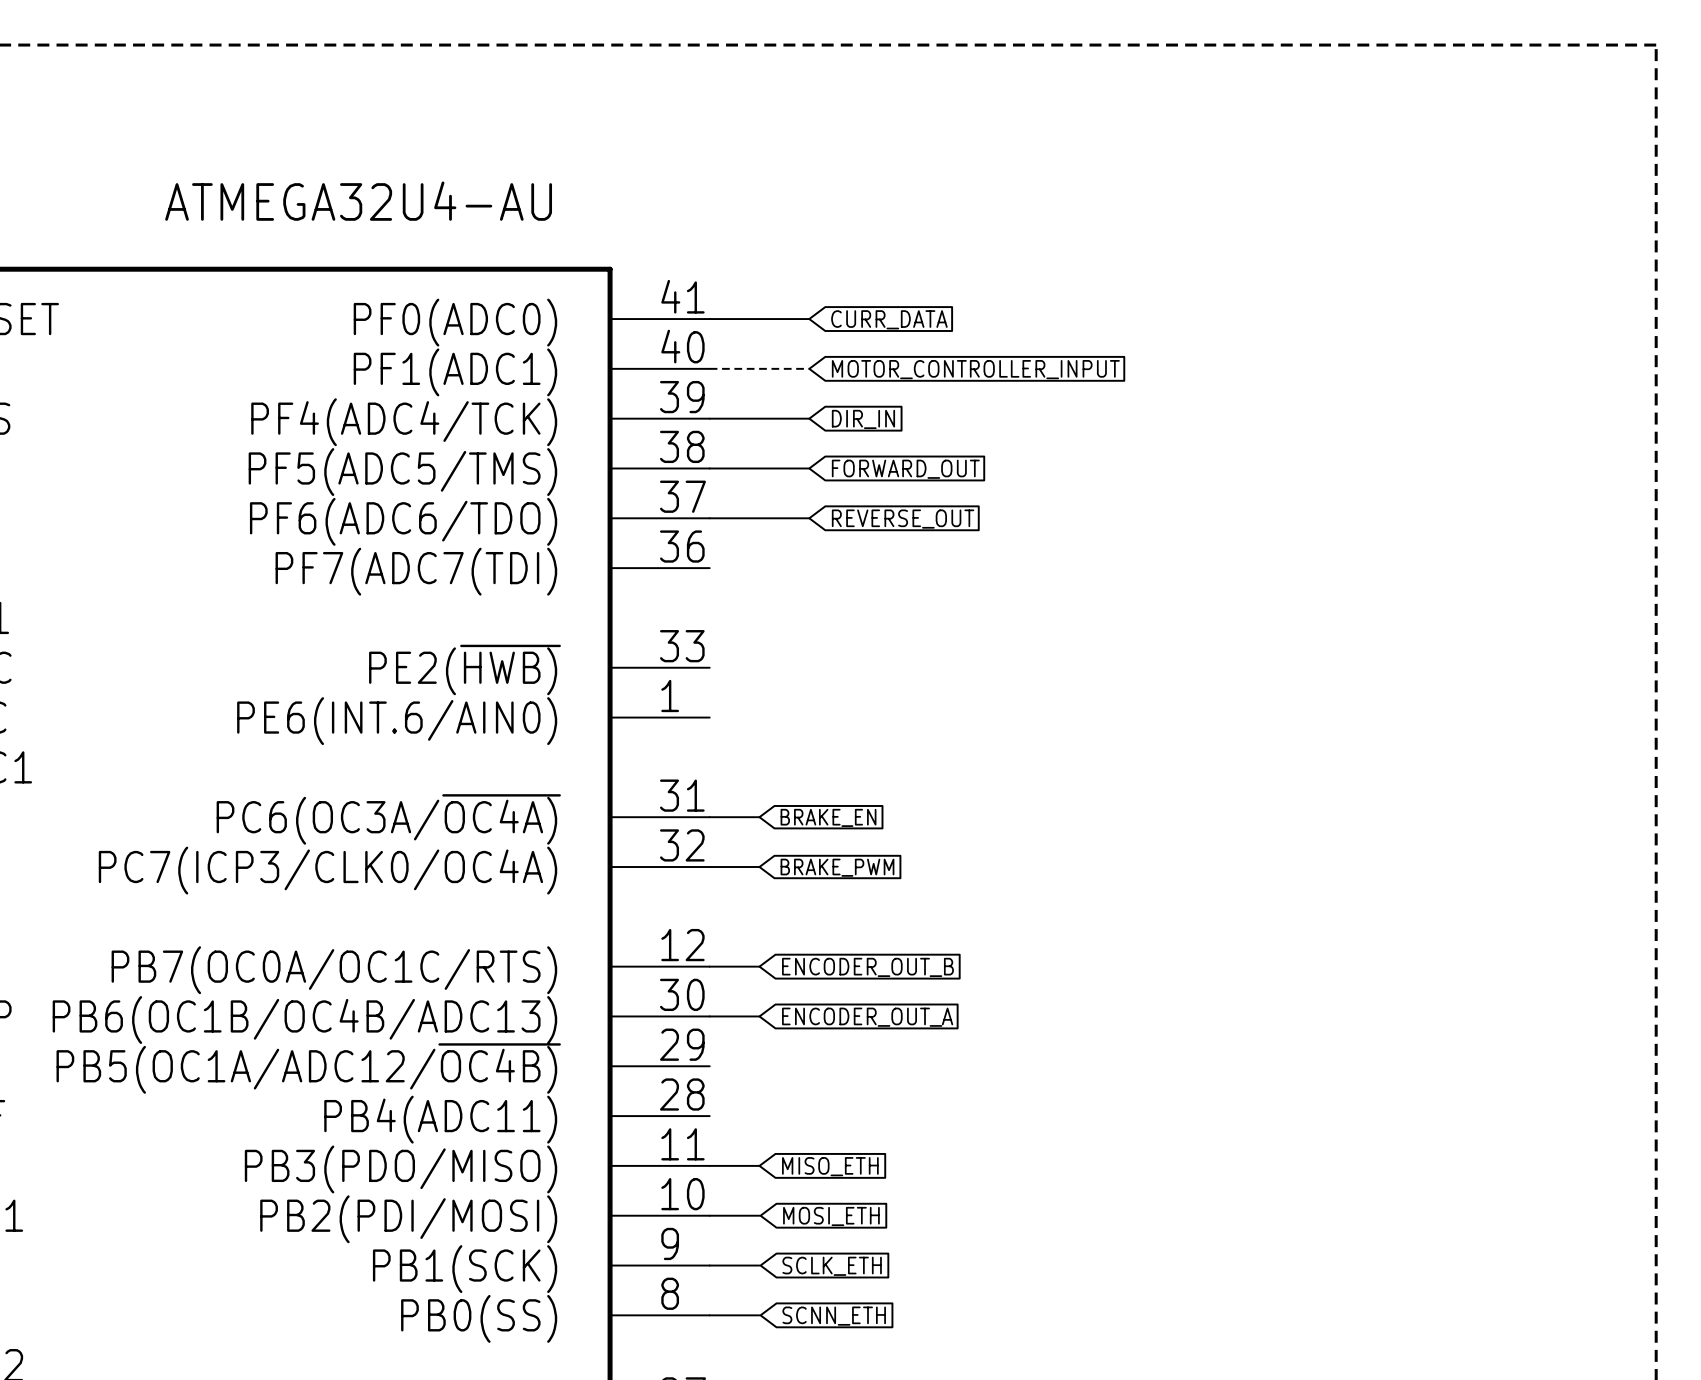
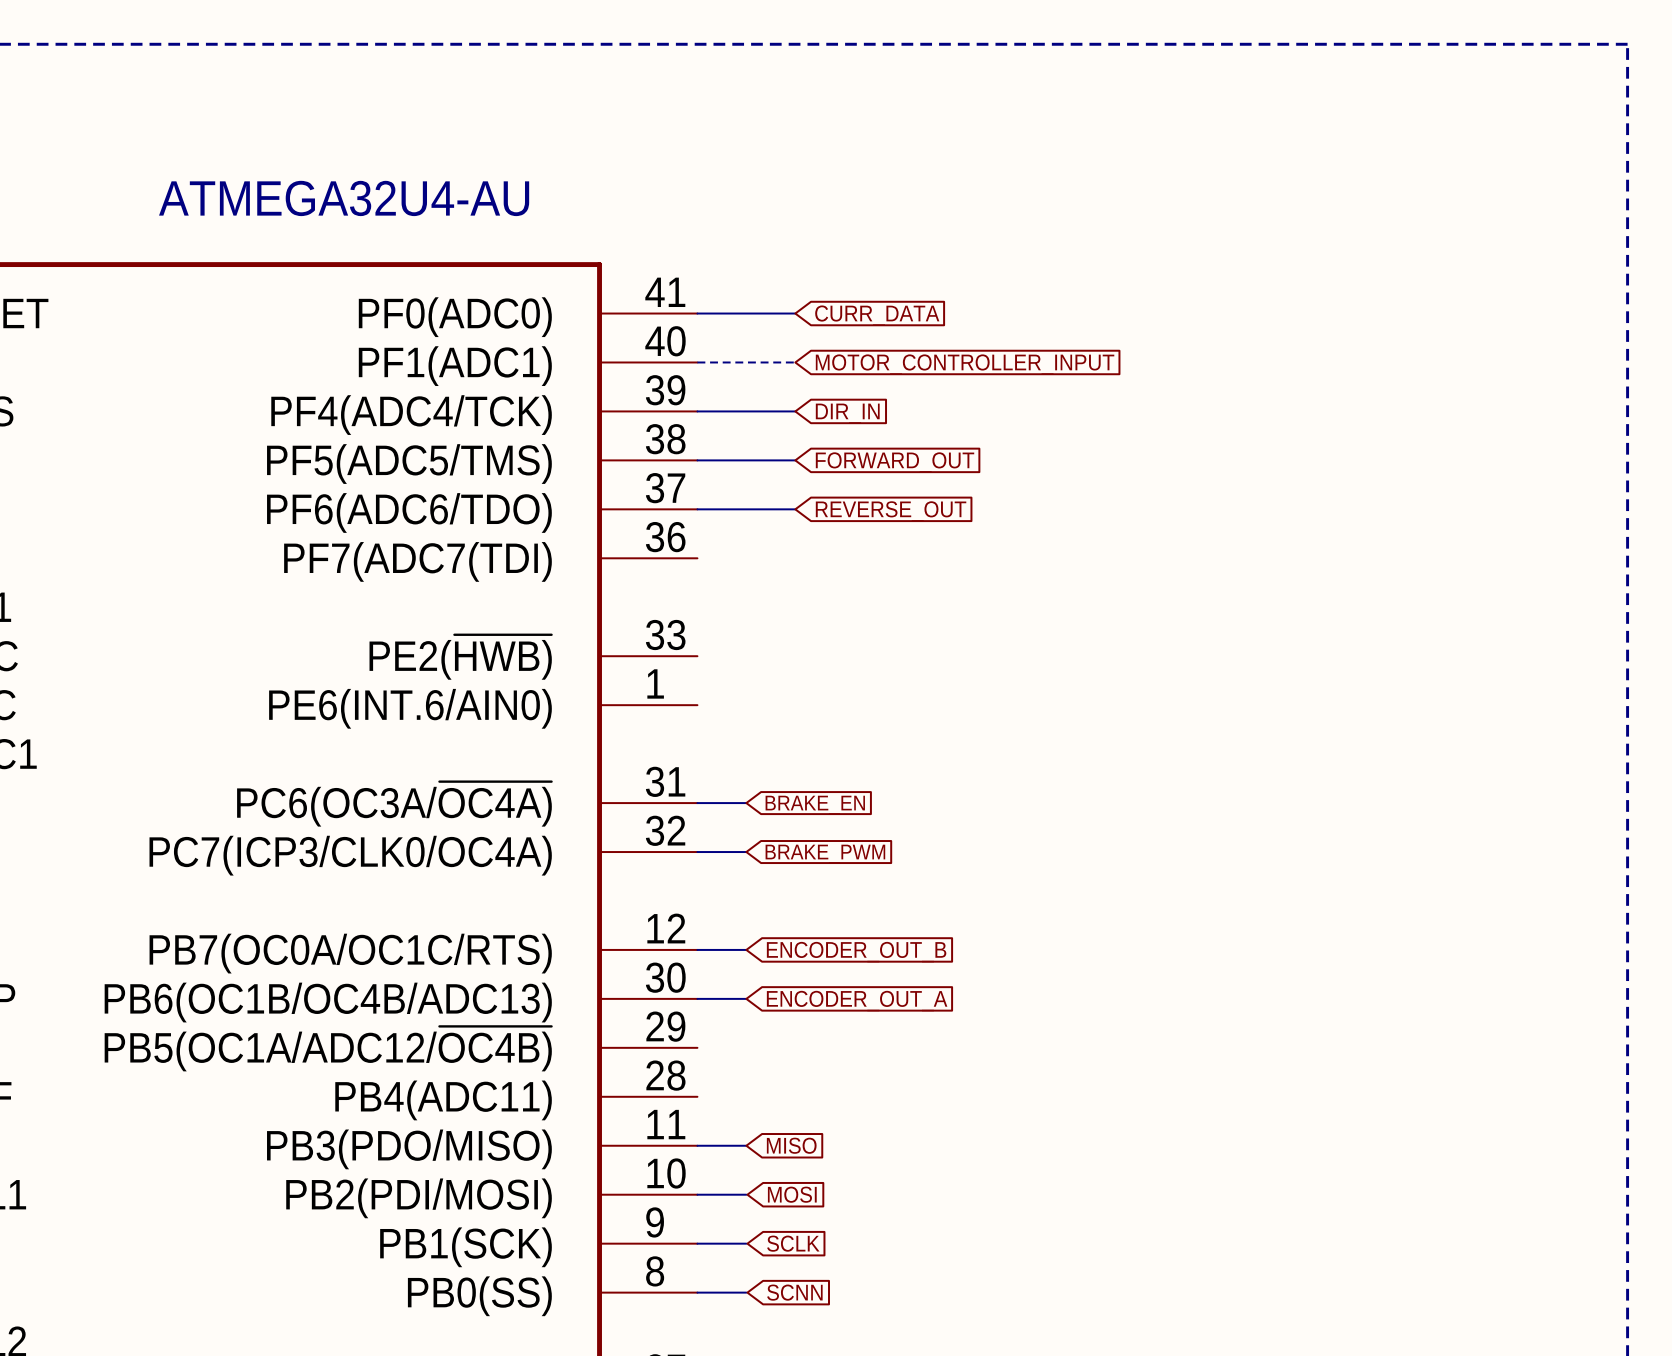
global label: MISO_ETH (830, 1166) -> MISO (791, 1145)
global label: MOSI_ETH (831, 1216) -> MOSI (792, 1194)
global label: SCLK_ETH (832, 1266) -> SCLK (793, 1243)
global label: SCNN_ETH (834, 1316) -> SCNN (794, 1292)

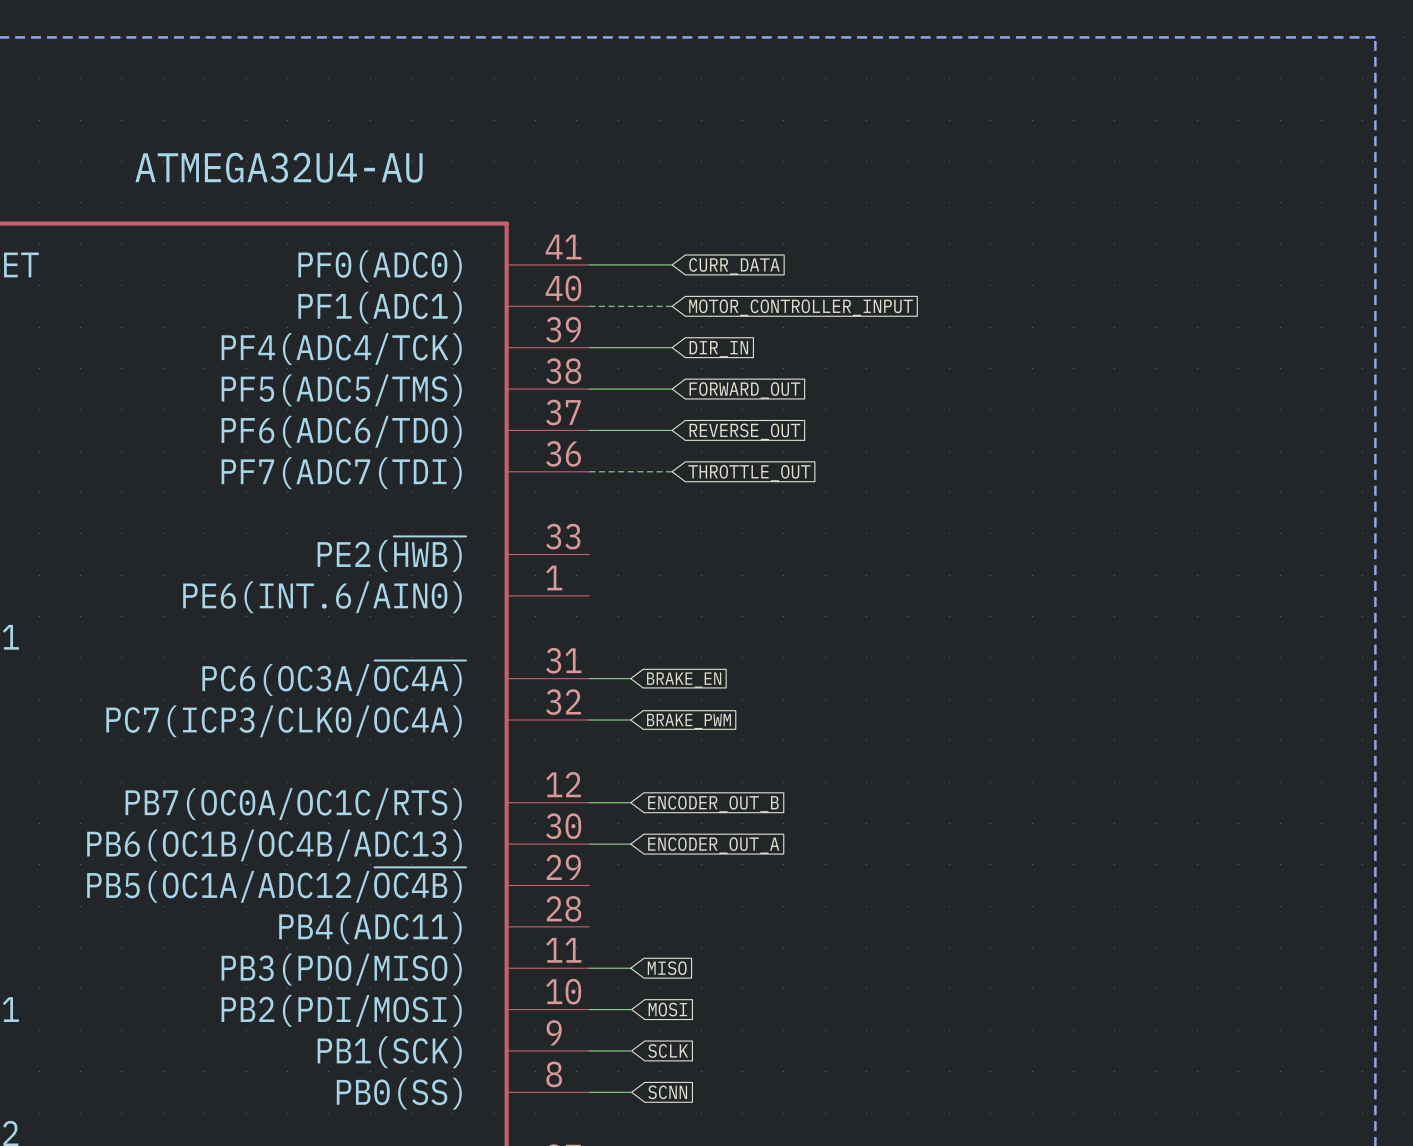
wire: none -> (589, 471) (672, 471)
global label: none -> THROTTLE_OUT (749, 473)

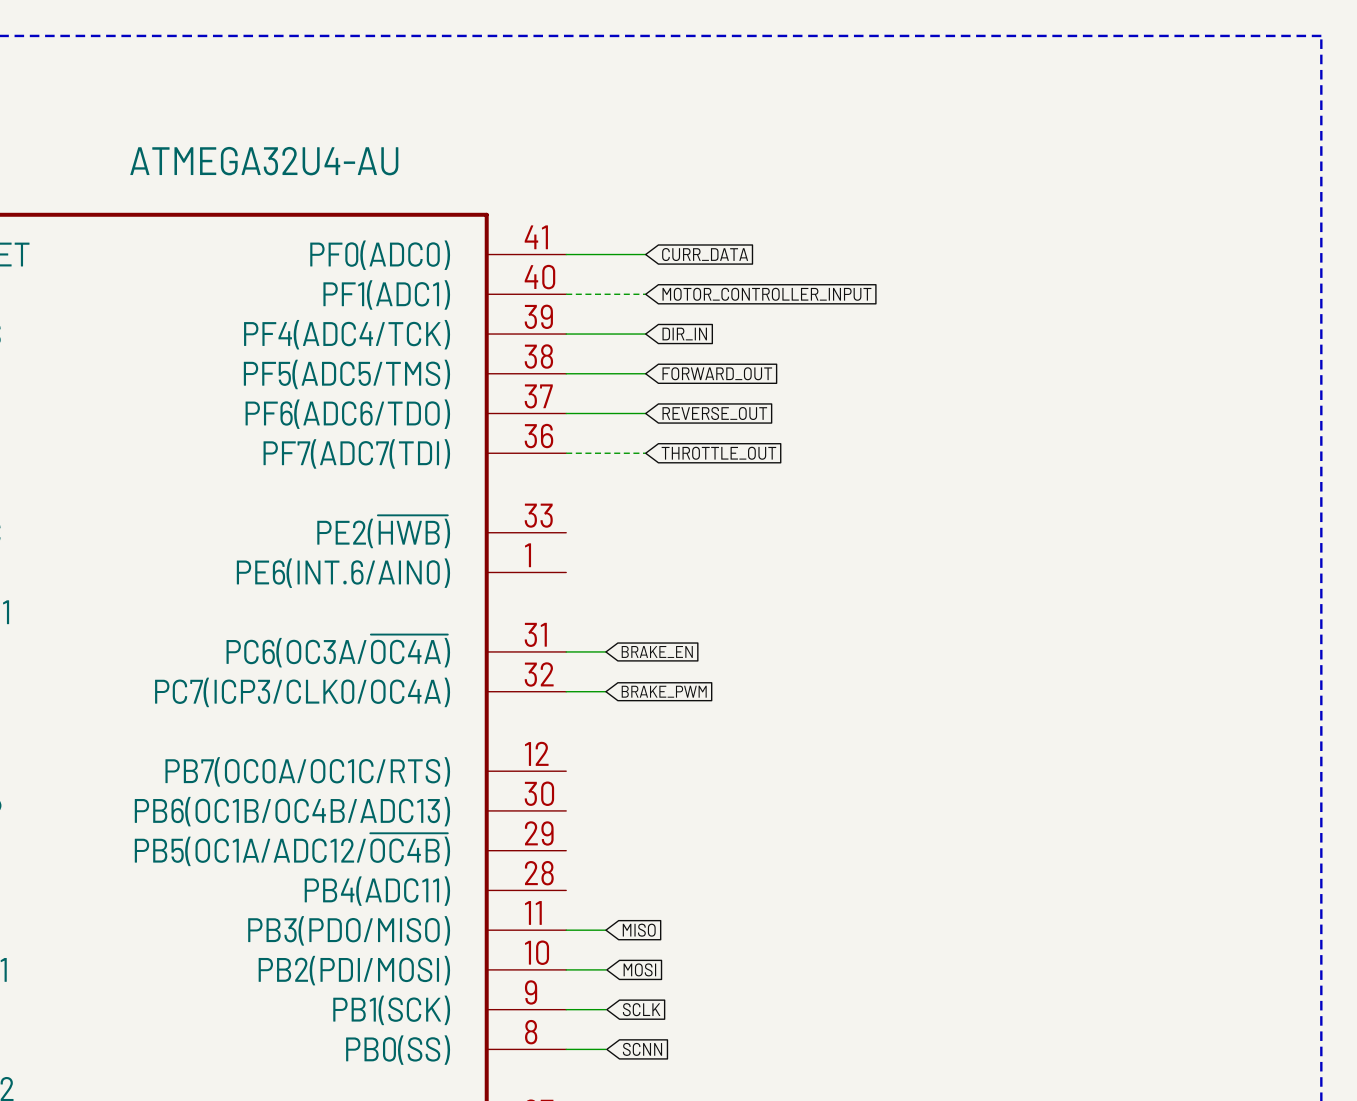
wire: (589, 802) (630, 802) -> none
global label: ENCODER_OUT_B (713, 804) -> none
wire: (589, 844) (630, 844) -> none
global label: ENCODER_OUT_A (713, 845) -> none

